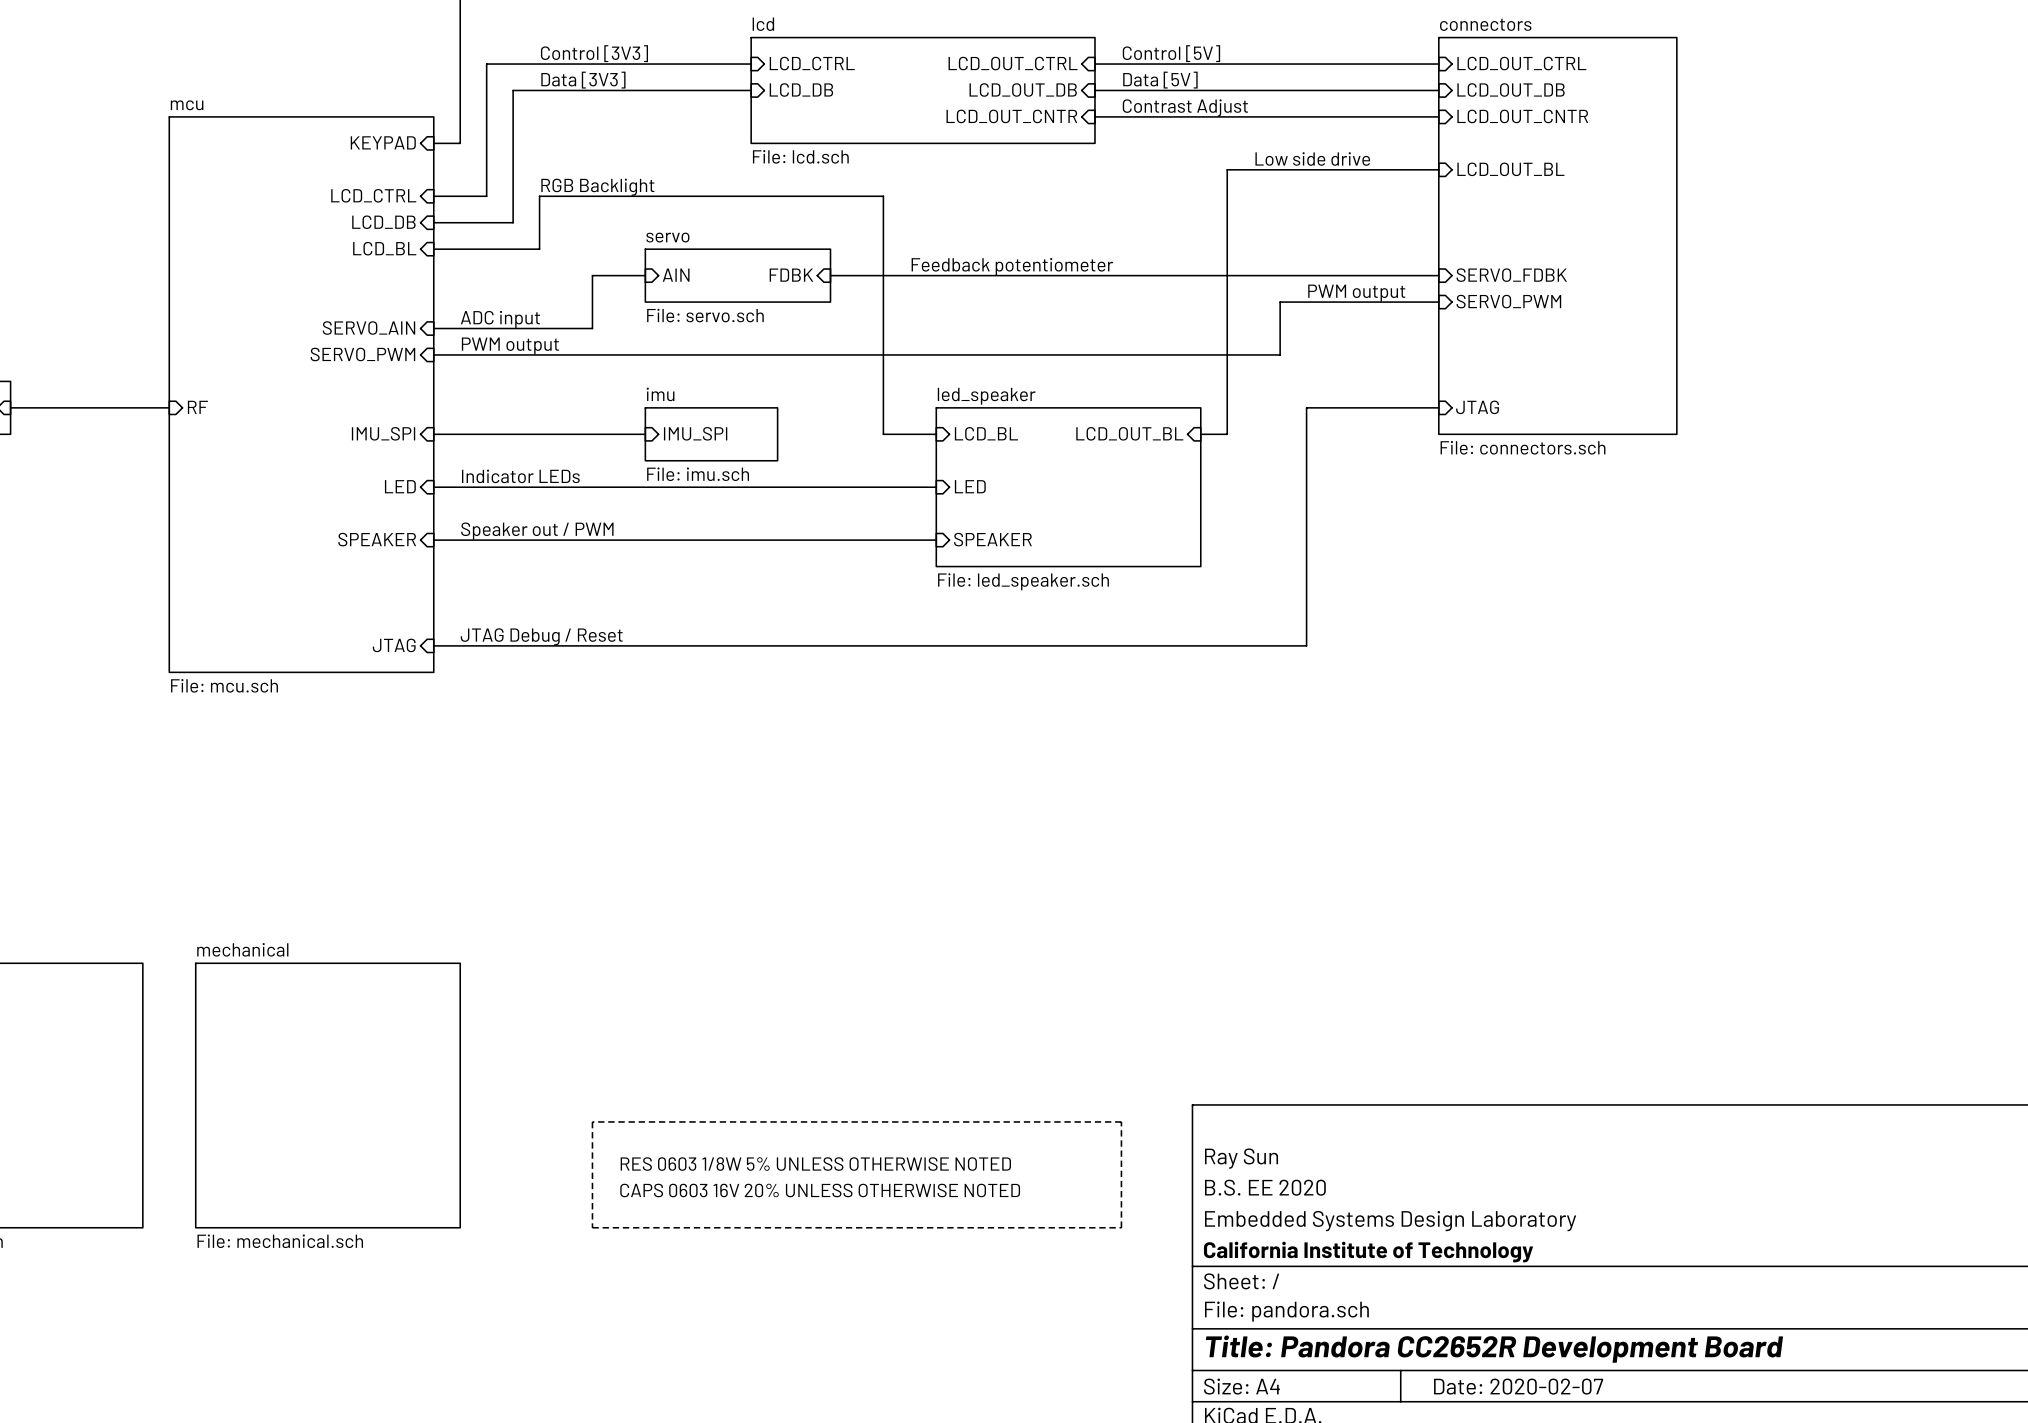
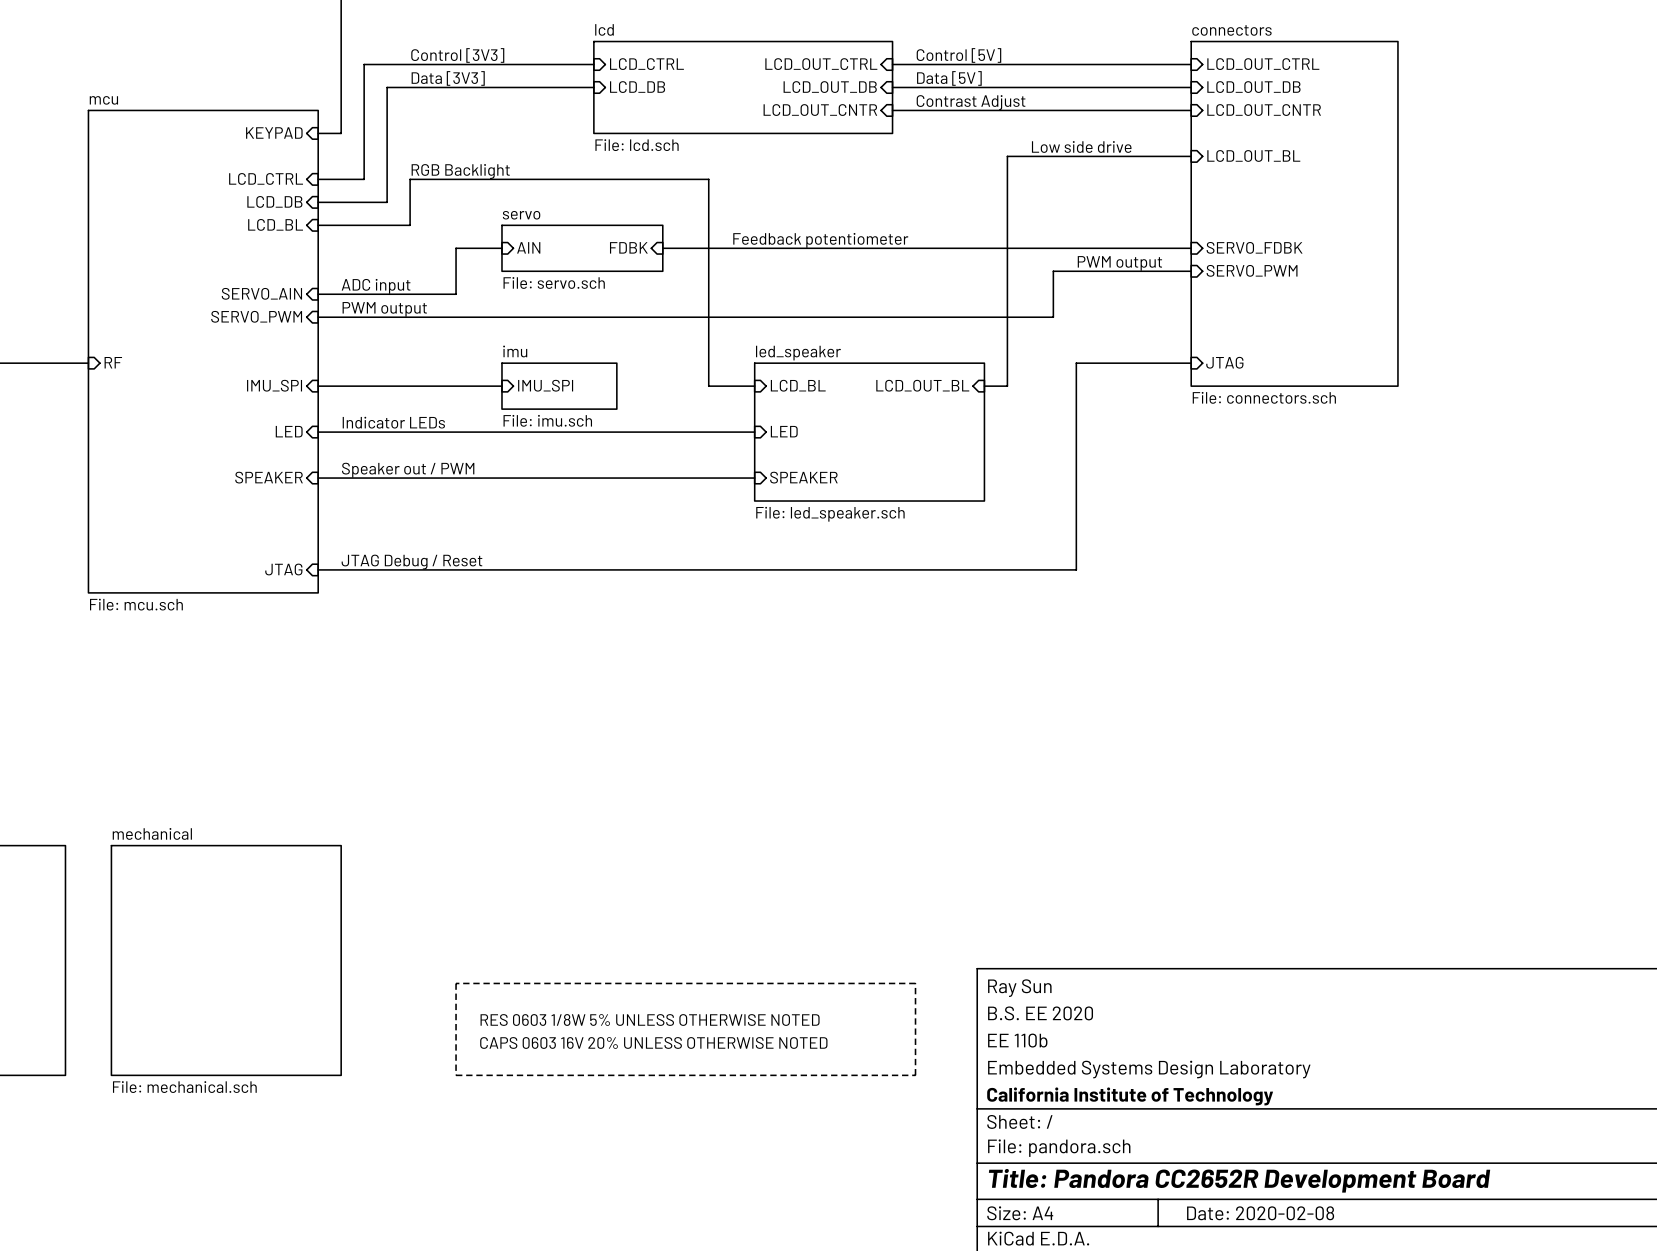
title block: none -> Ray Sun (1019, 988)
title block: Ray Sun (1241, 1158) -> B.S. EE 2020 (1040, 1013)
title block: B.S. EE 2020 (1265, 1187) -> EE 110b (1017, 1040)
title block: Date: 2020-02-07 (1518, 1386) -> Date: 2020-02-08 (1260, 1213)

